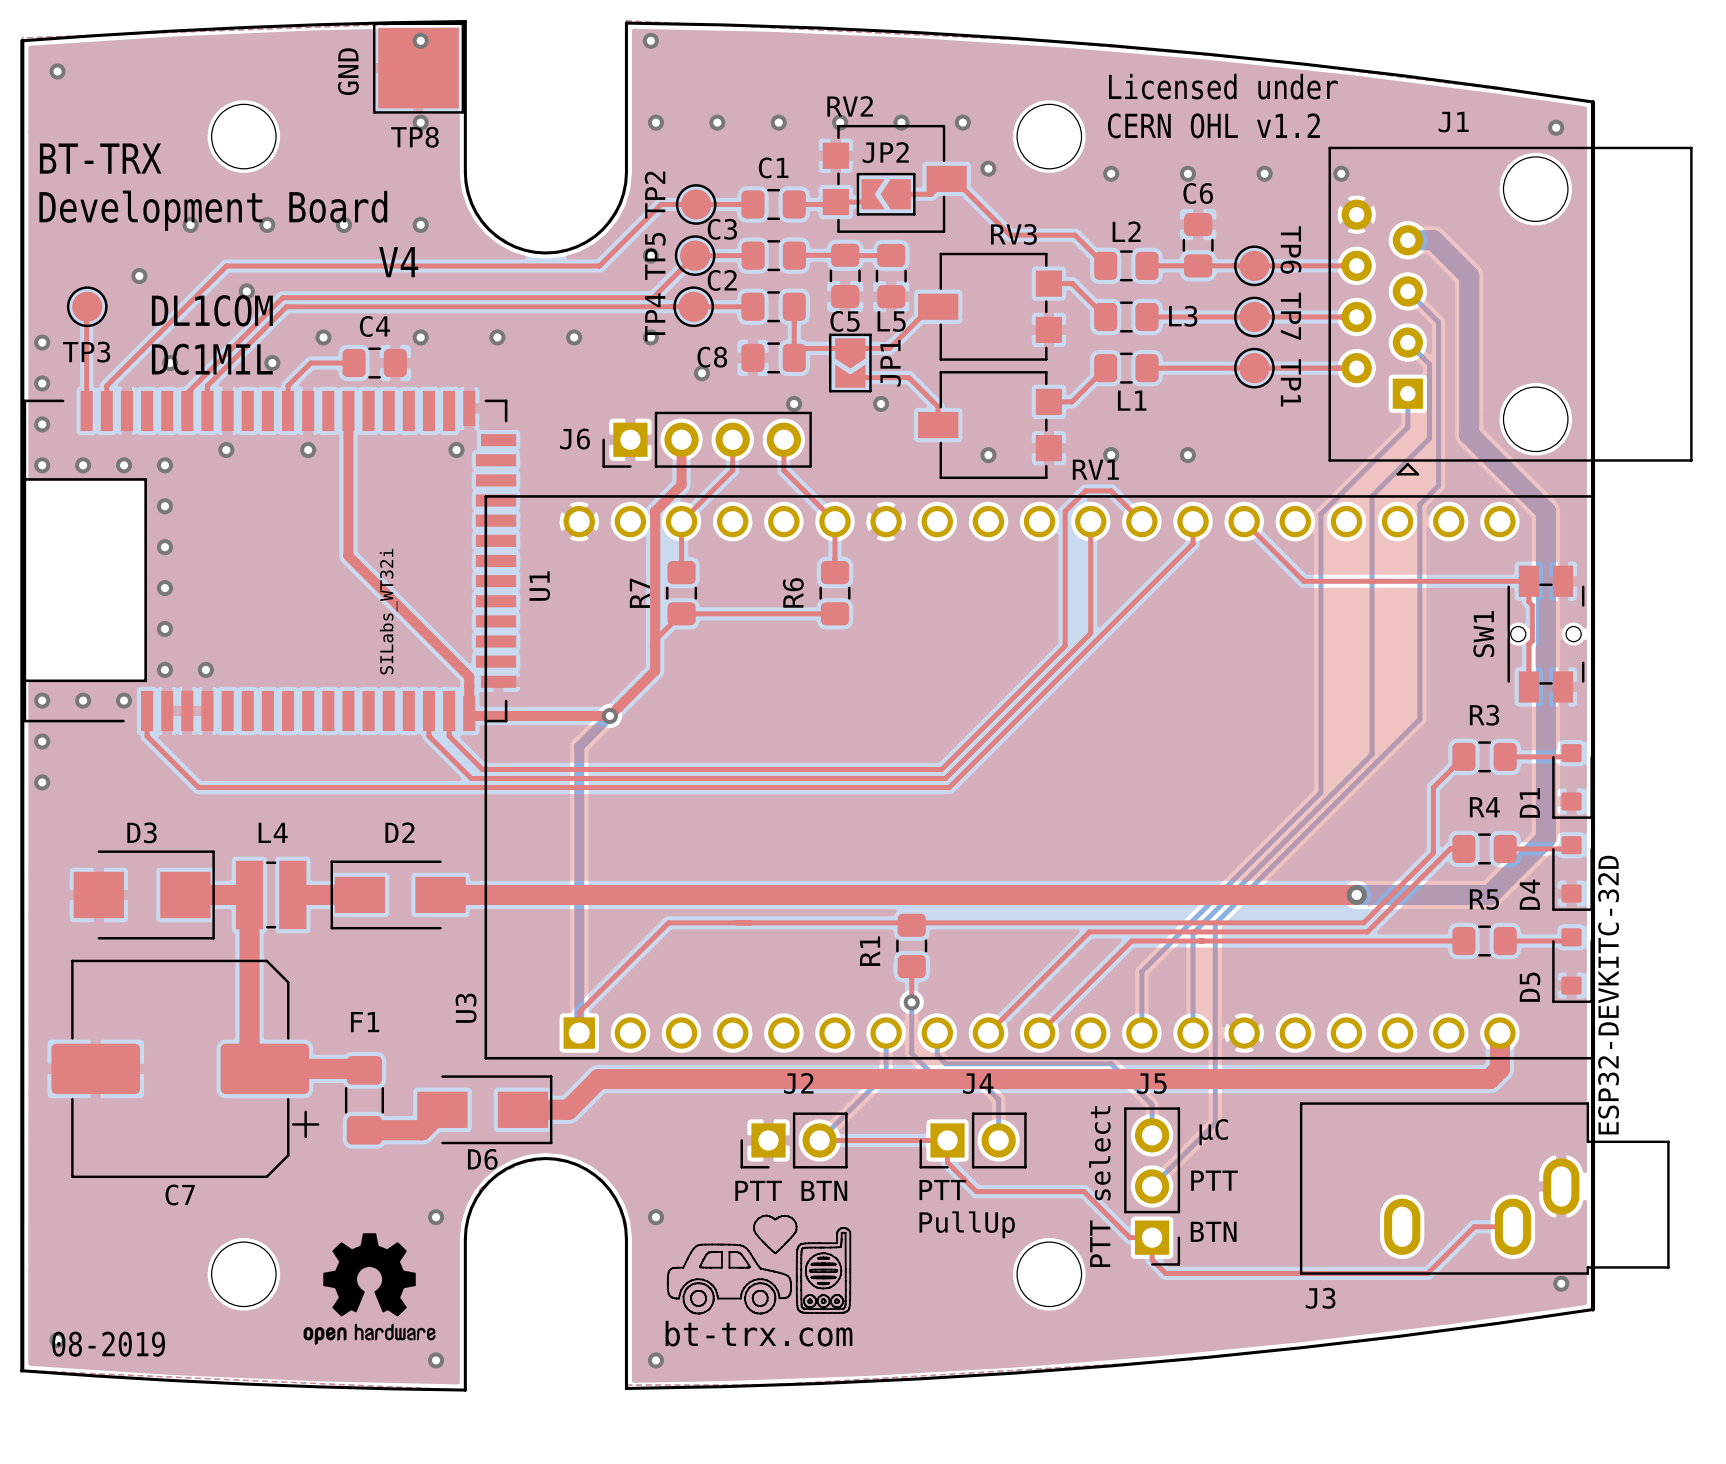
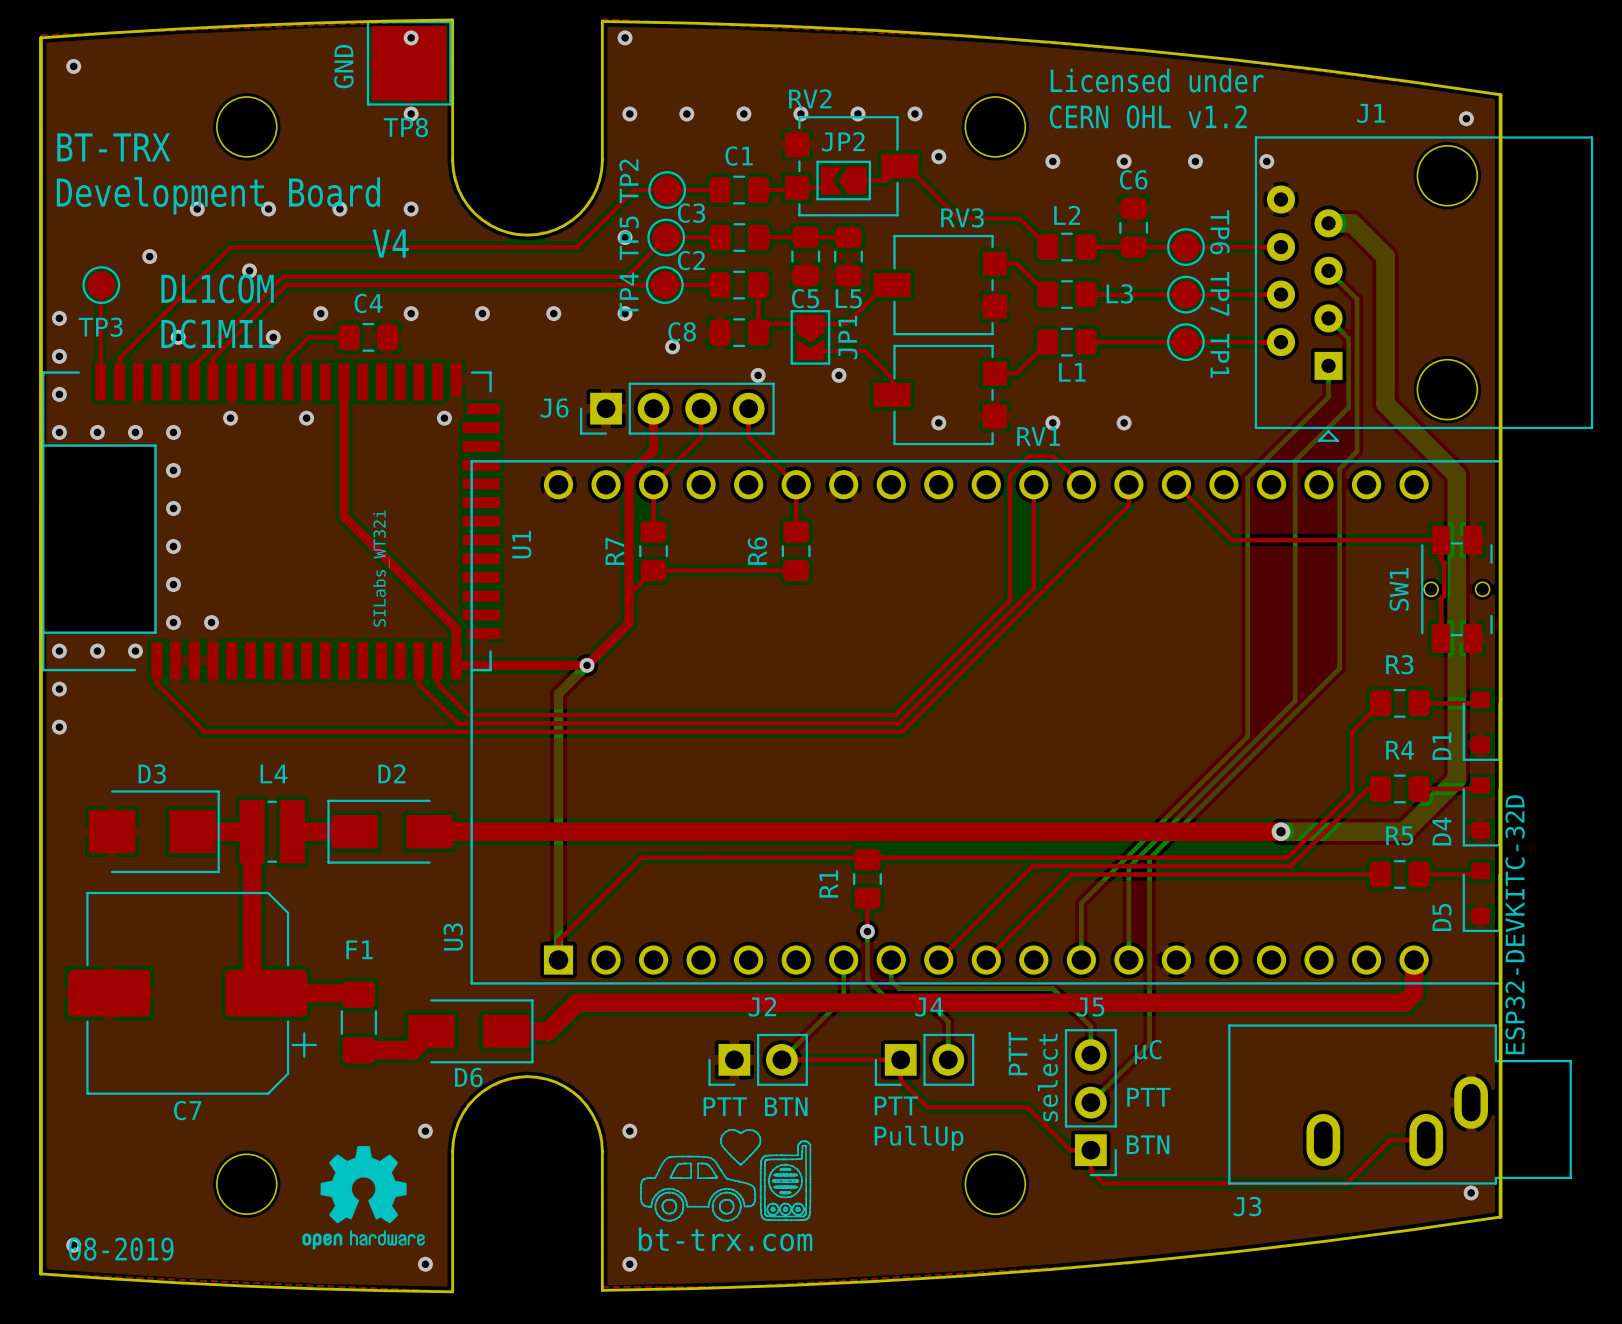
text: none -> PTT (1018, 1053)
text: PTT select (1099, 1186) -> select (1047, 1077)

